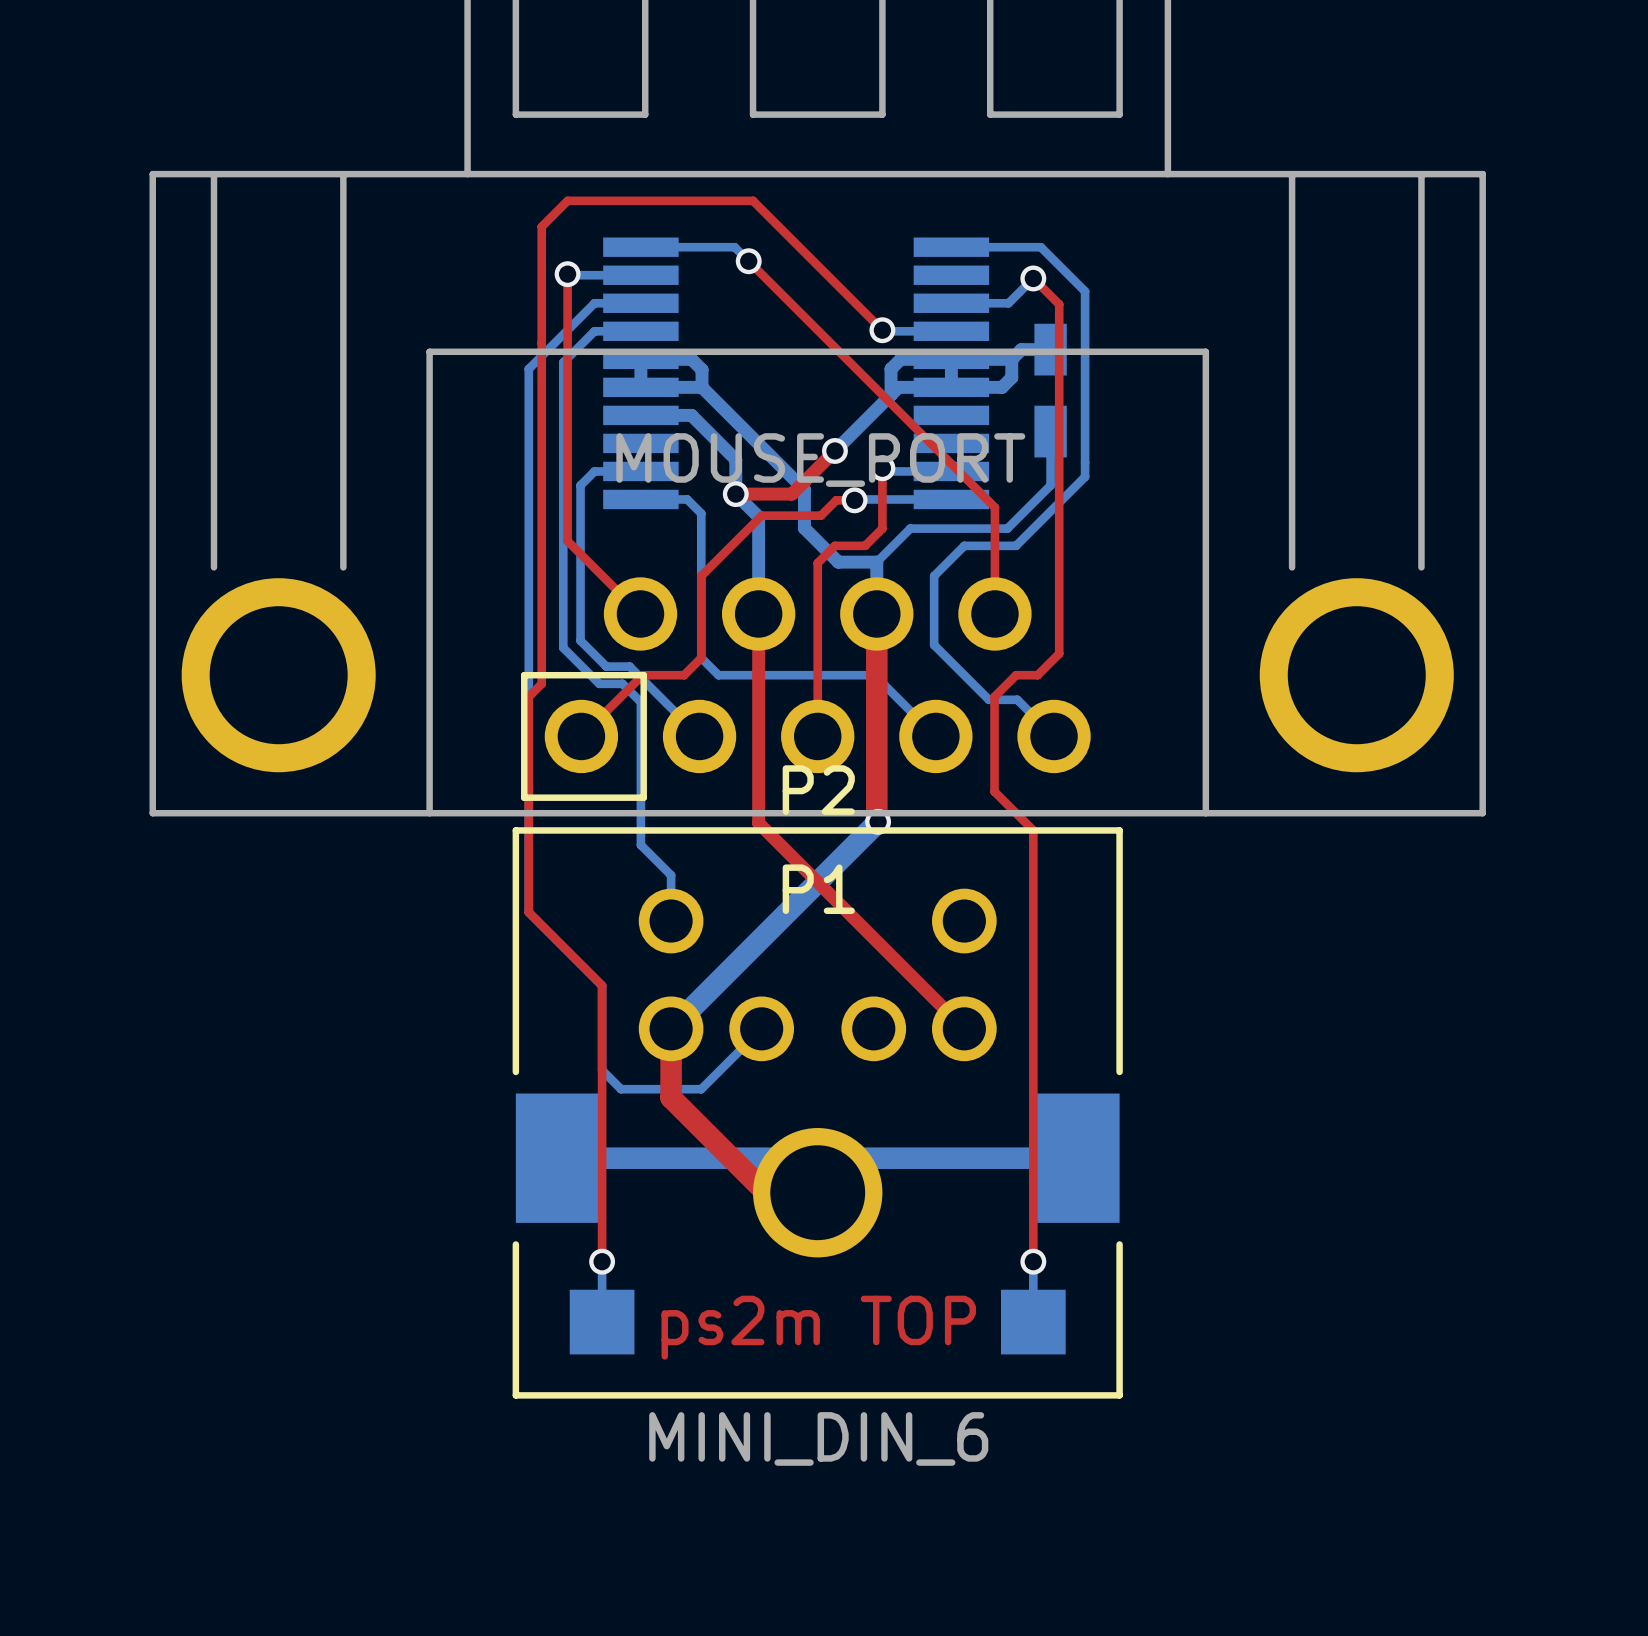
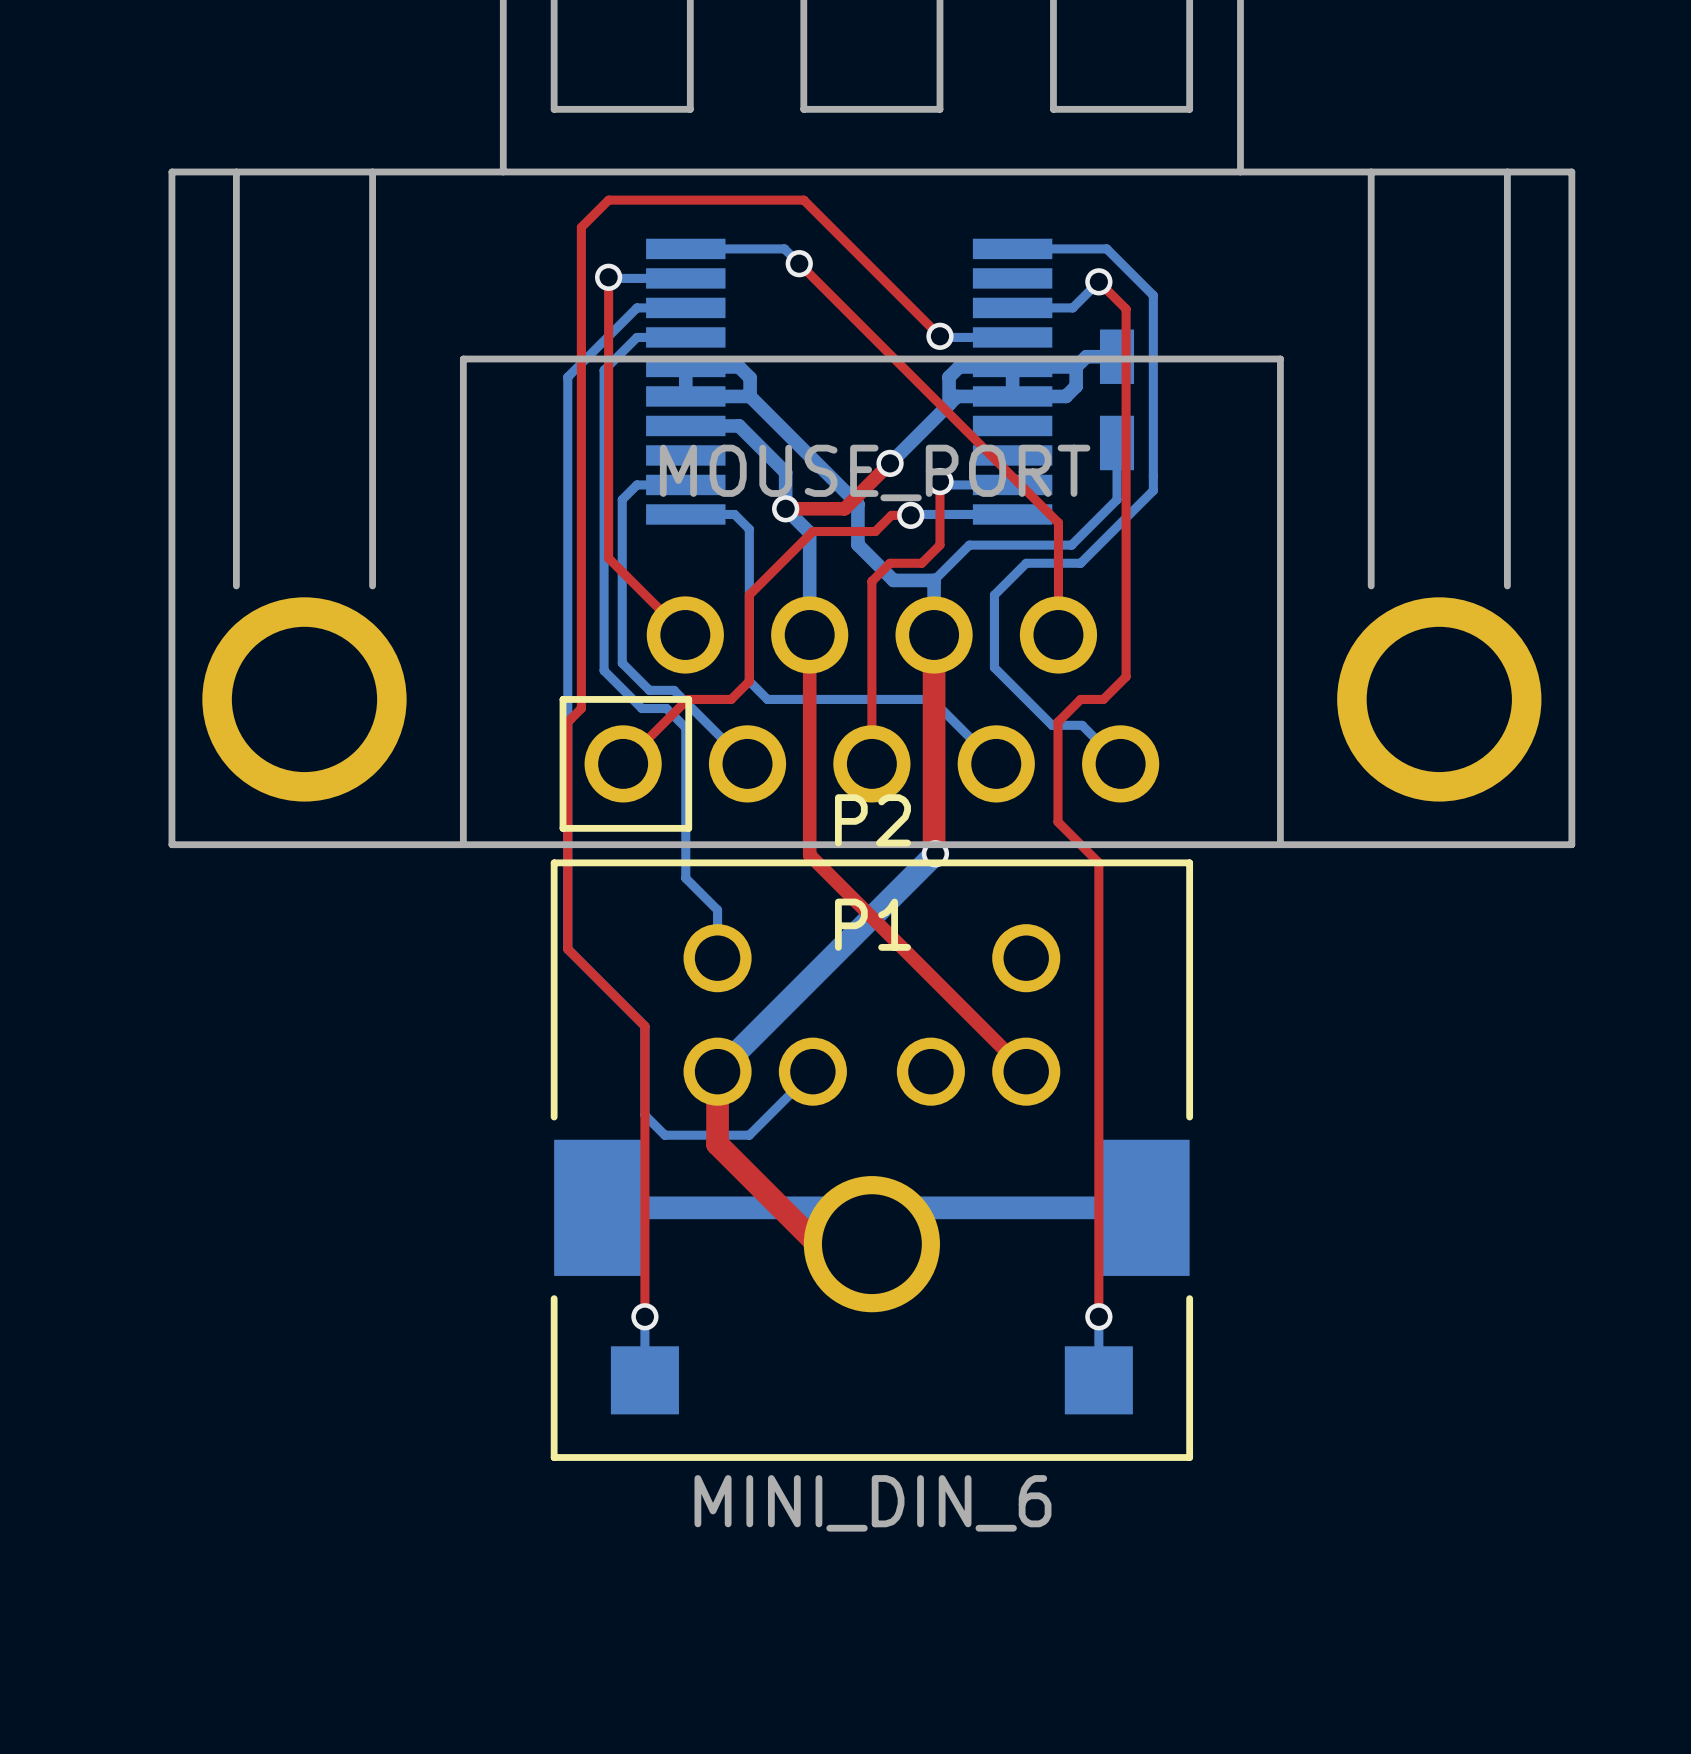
text: ps2m TOP (818, 1327) -> none

